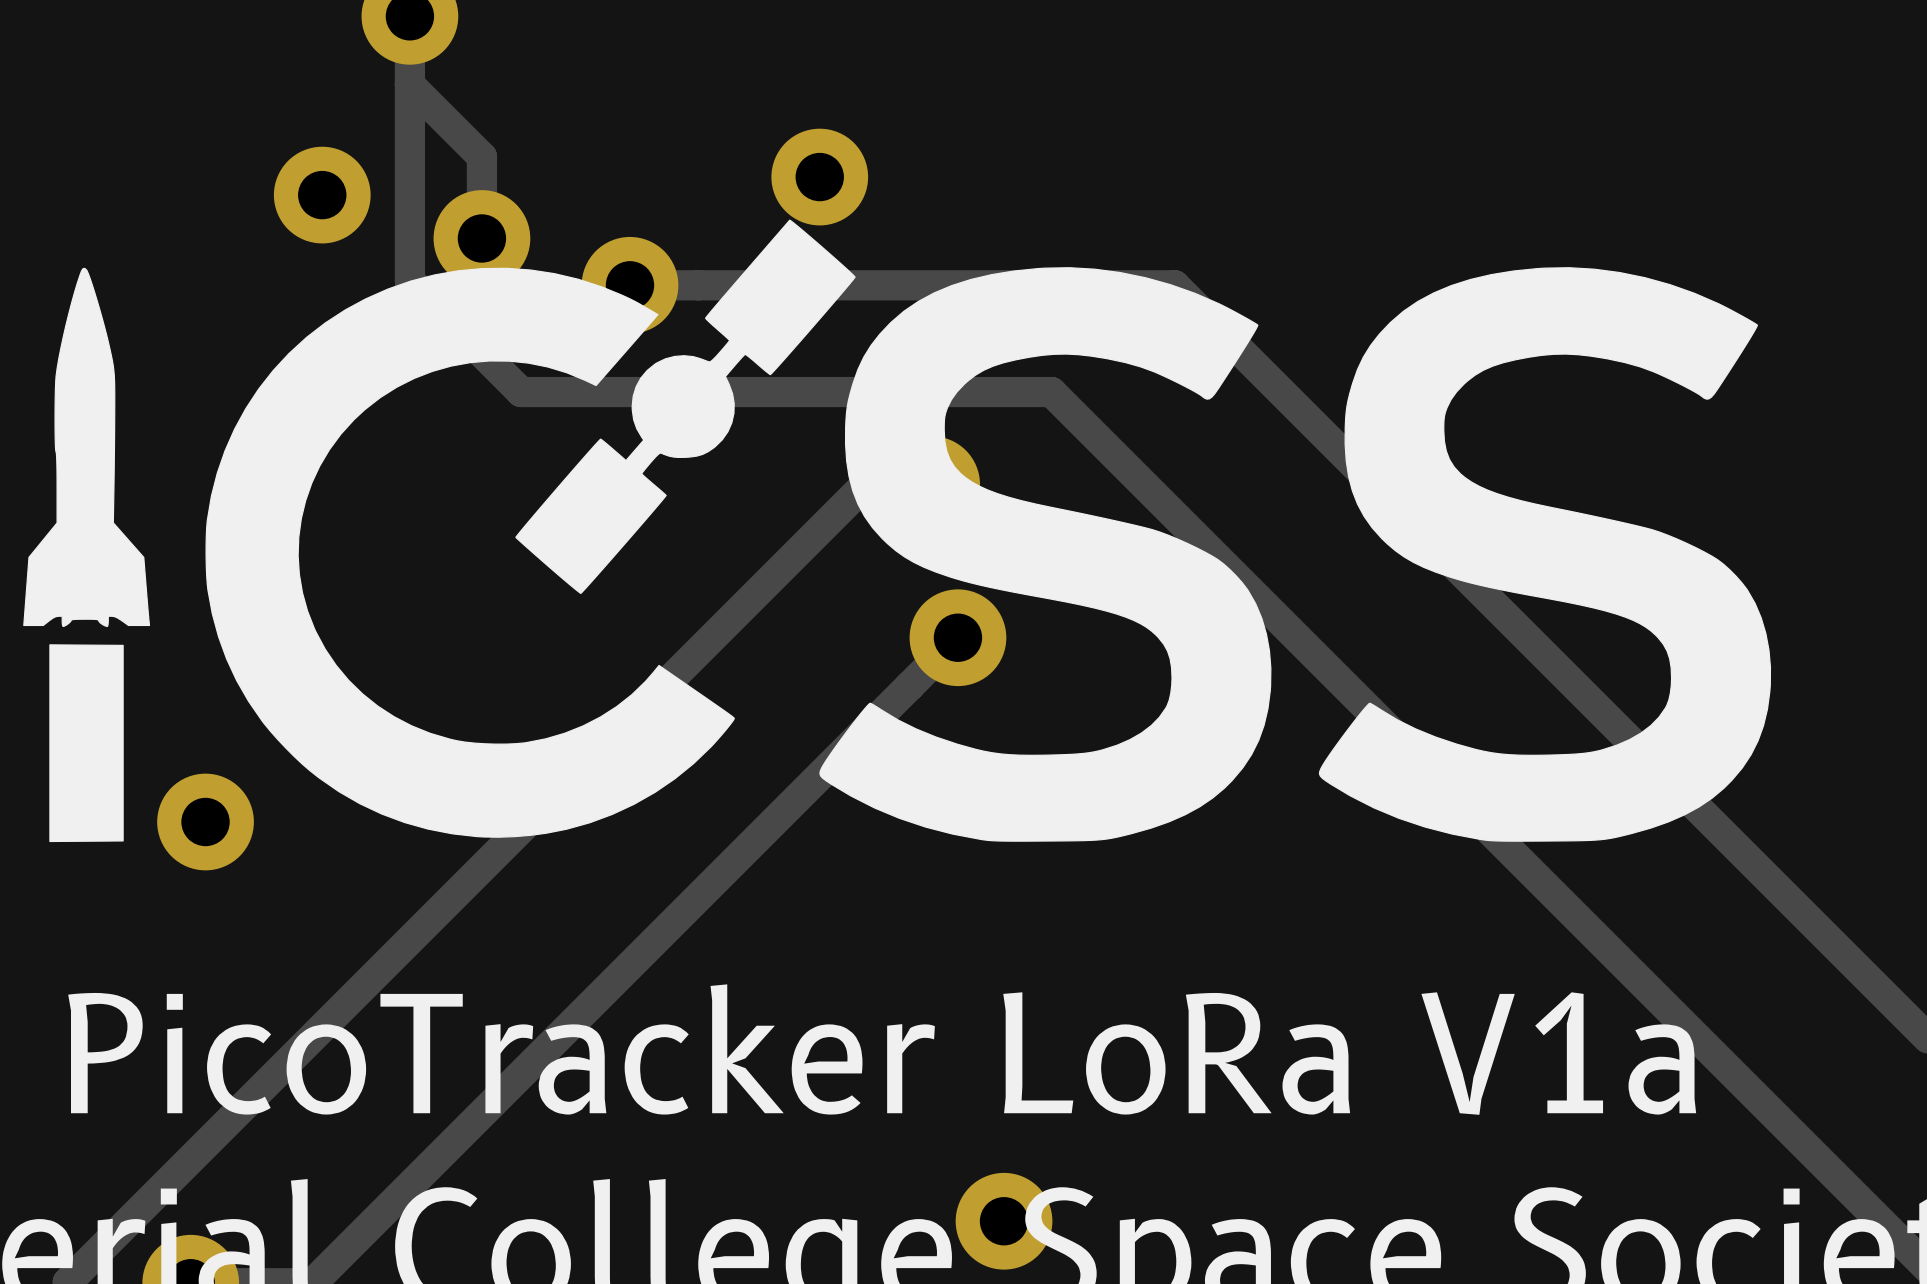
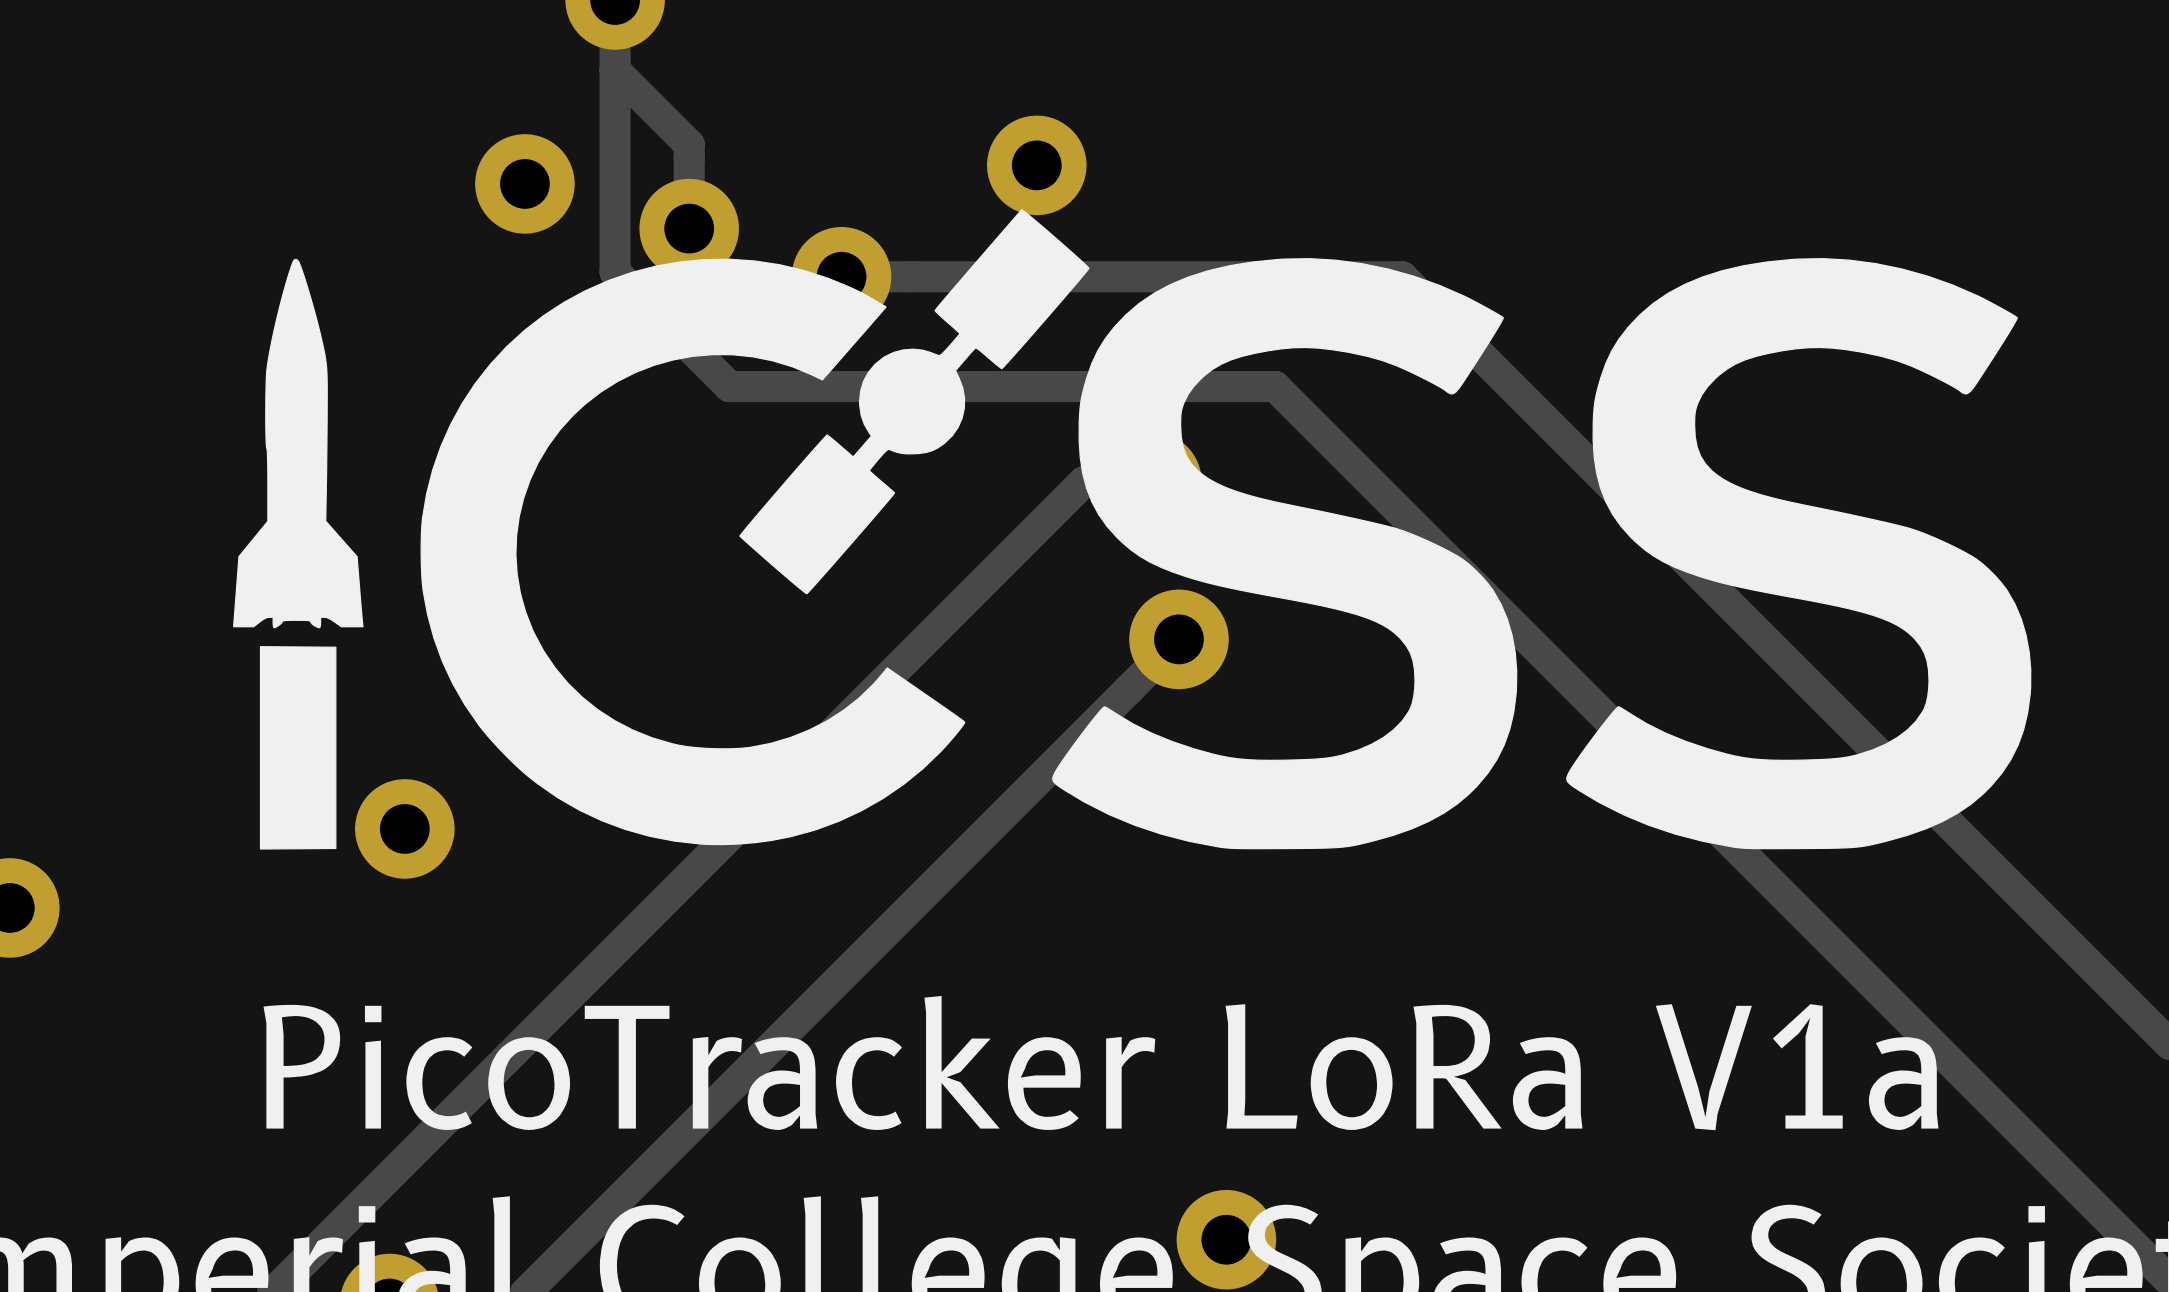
drawing position: (897, 530) -> (1132, 529)

